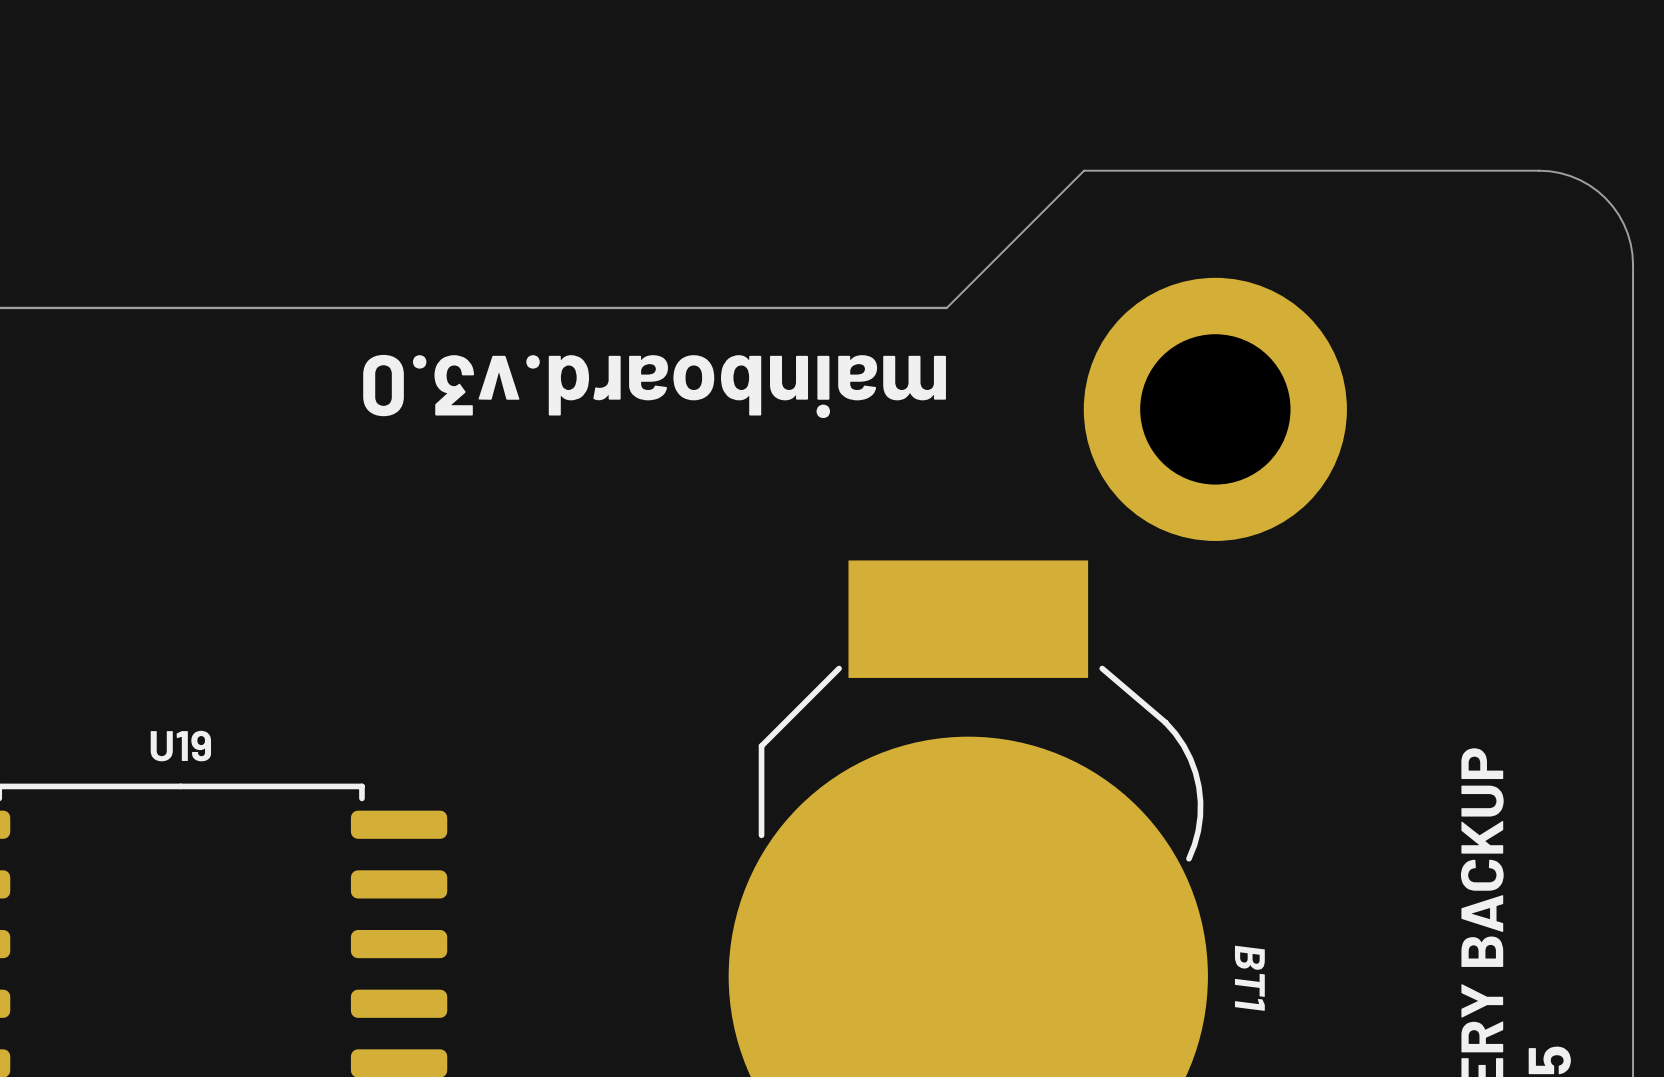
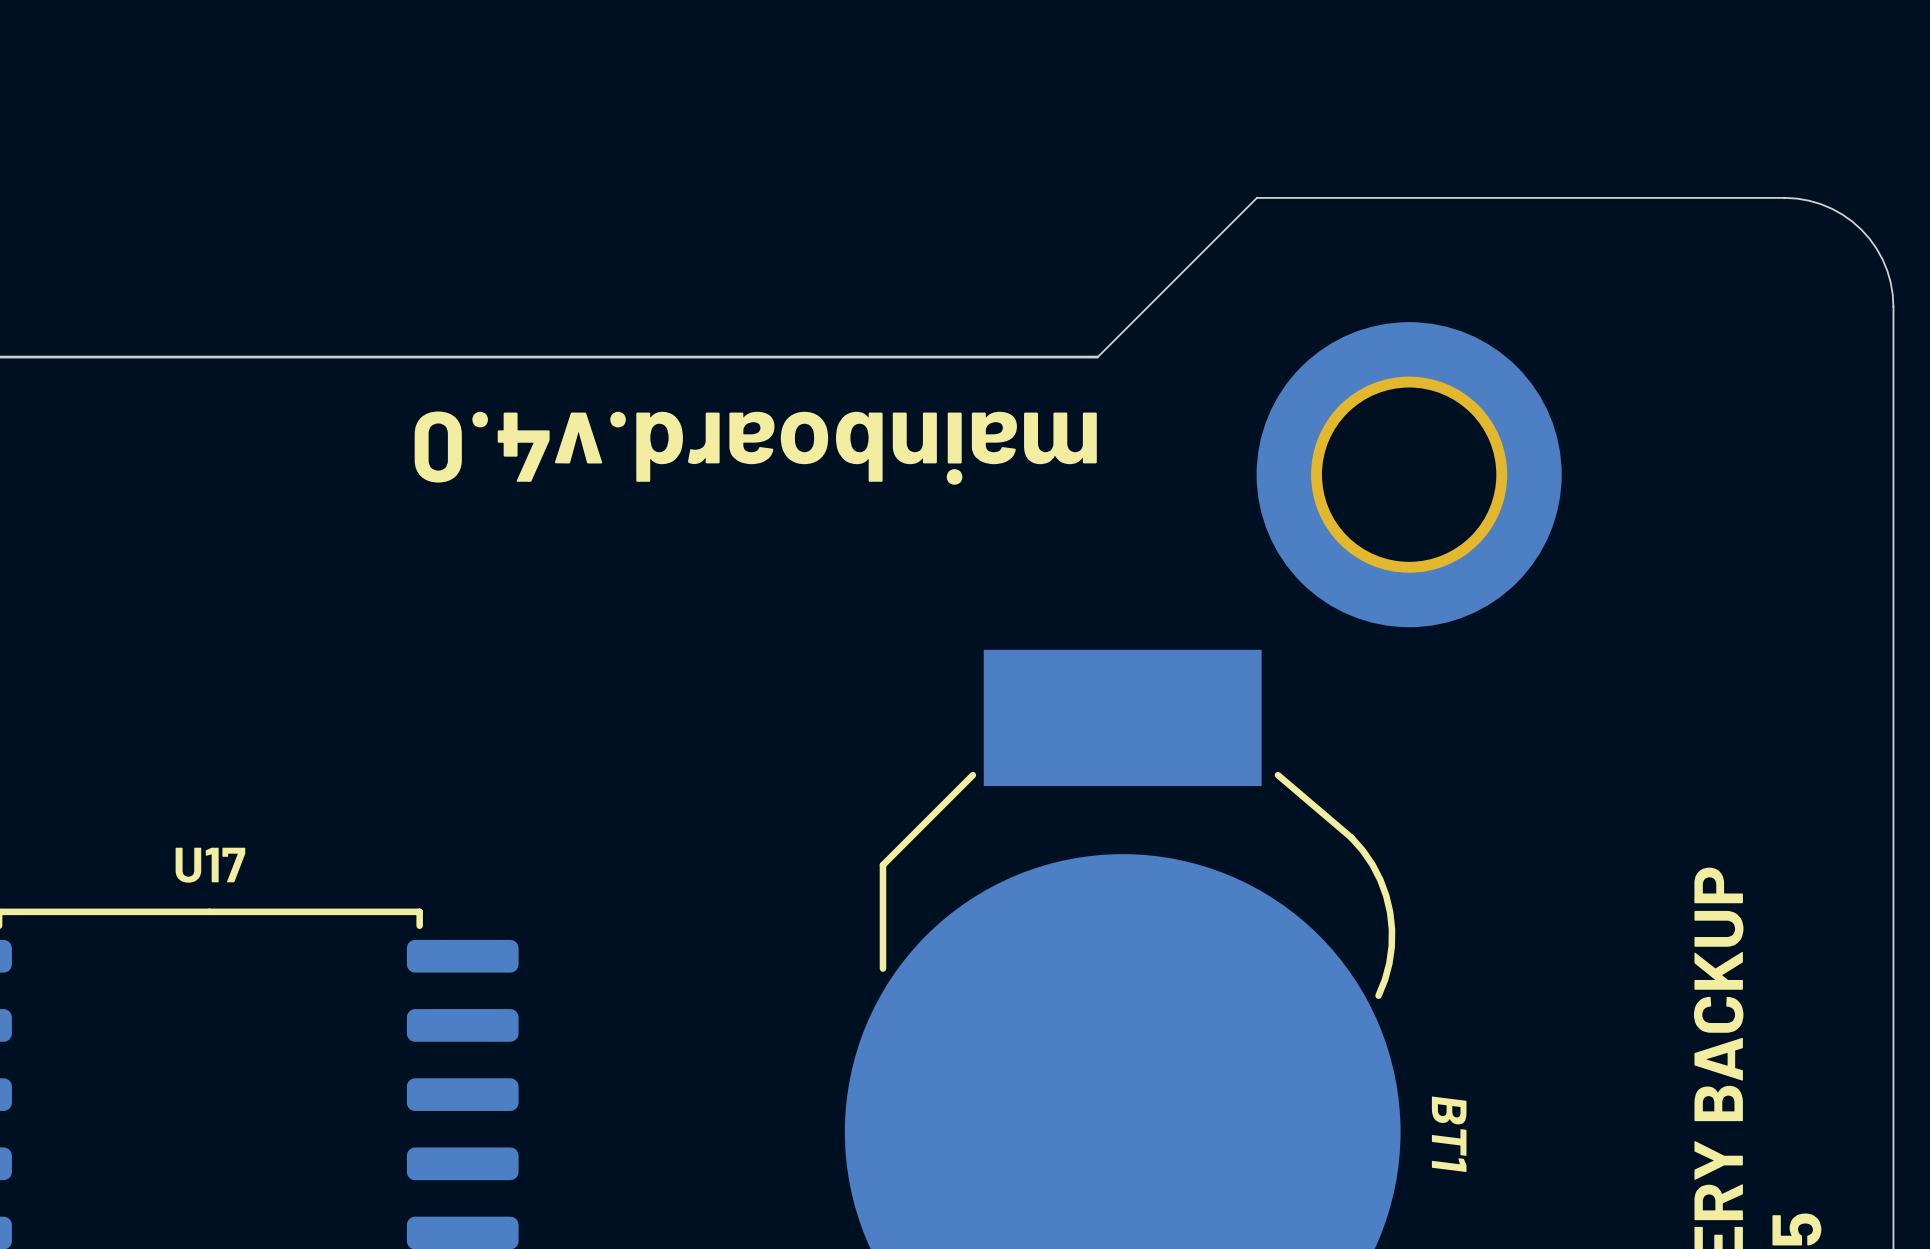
text: mainboard.v3.0 (654, 386) -> mainboard.v4.0 (755, 448)
U19 name: U19 (180, 746) -> U17 (210, 865)

